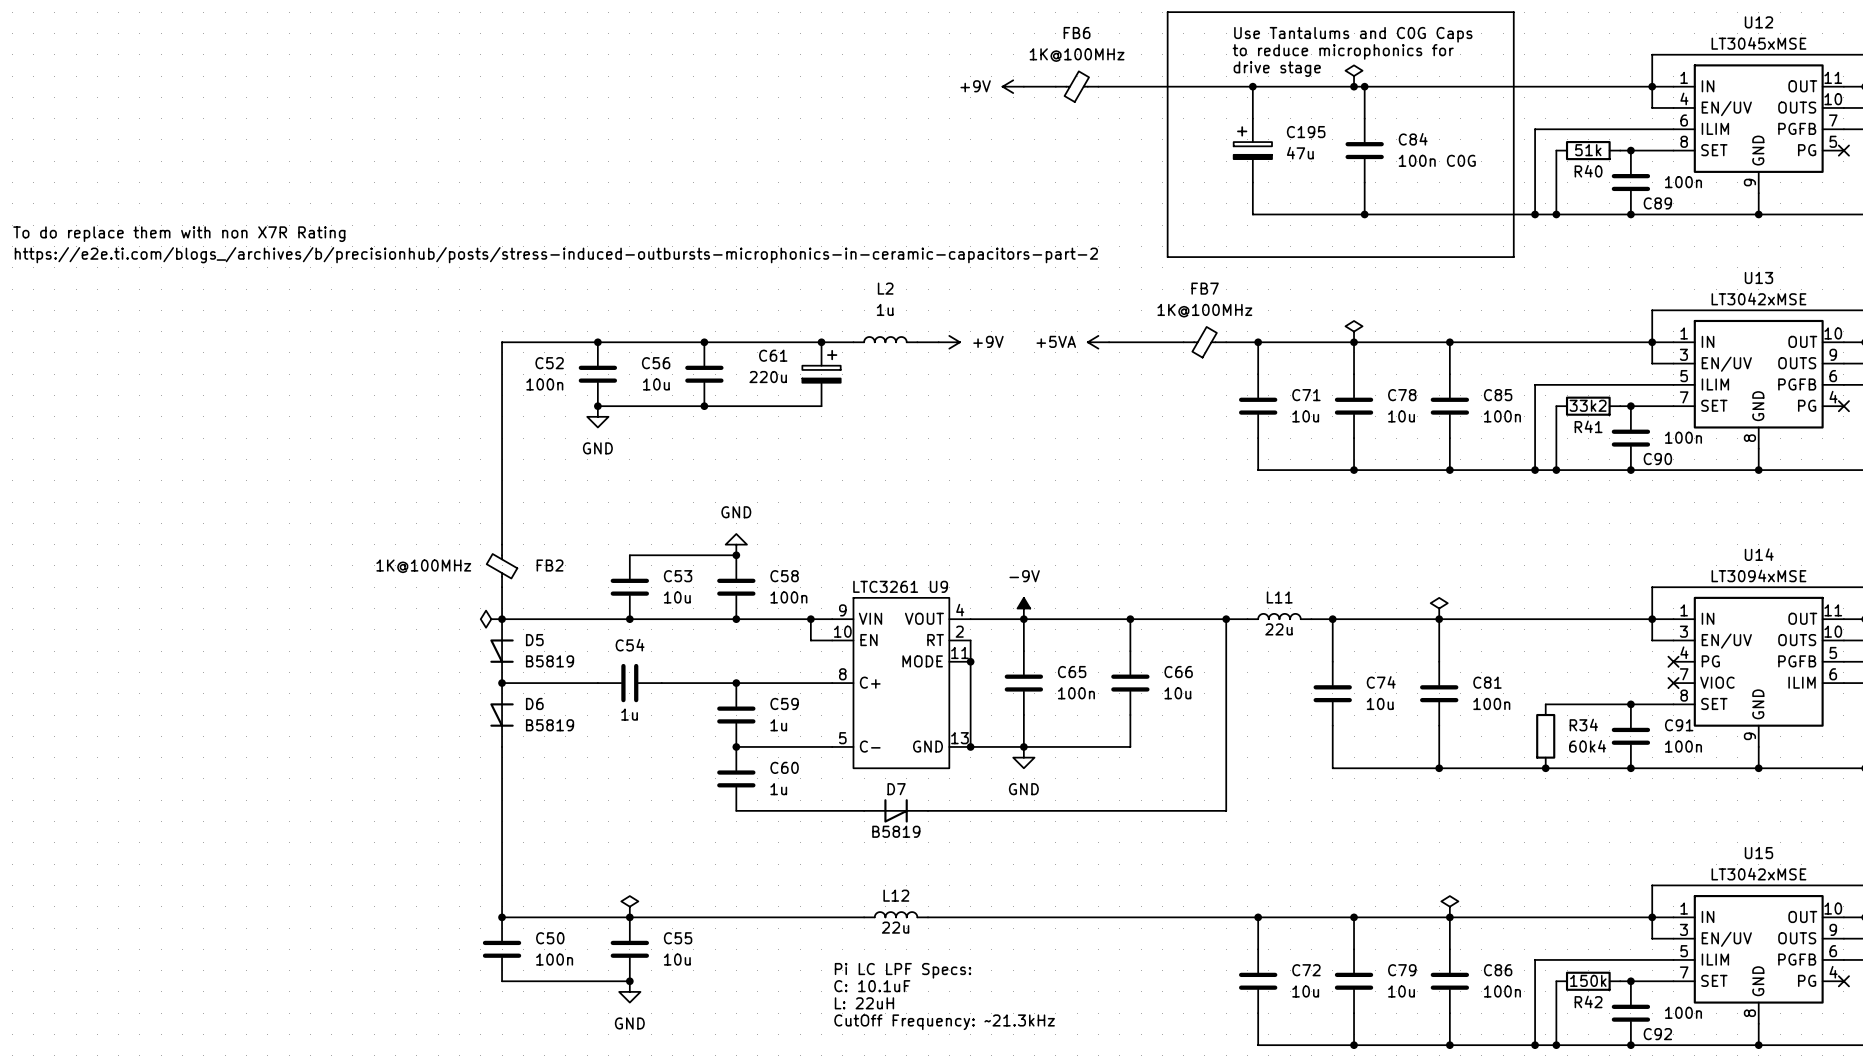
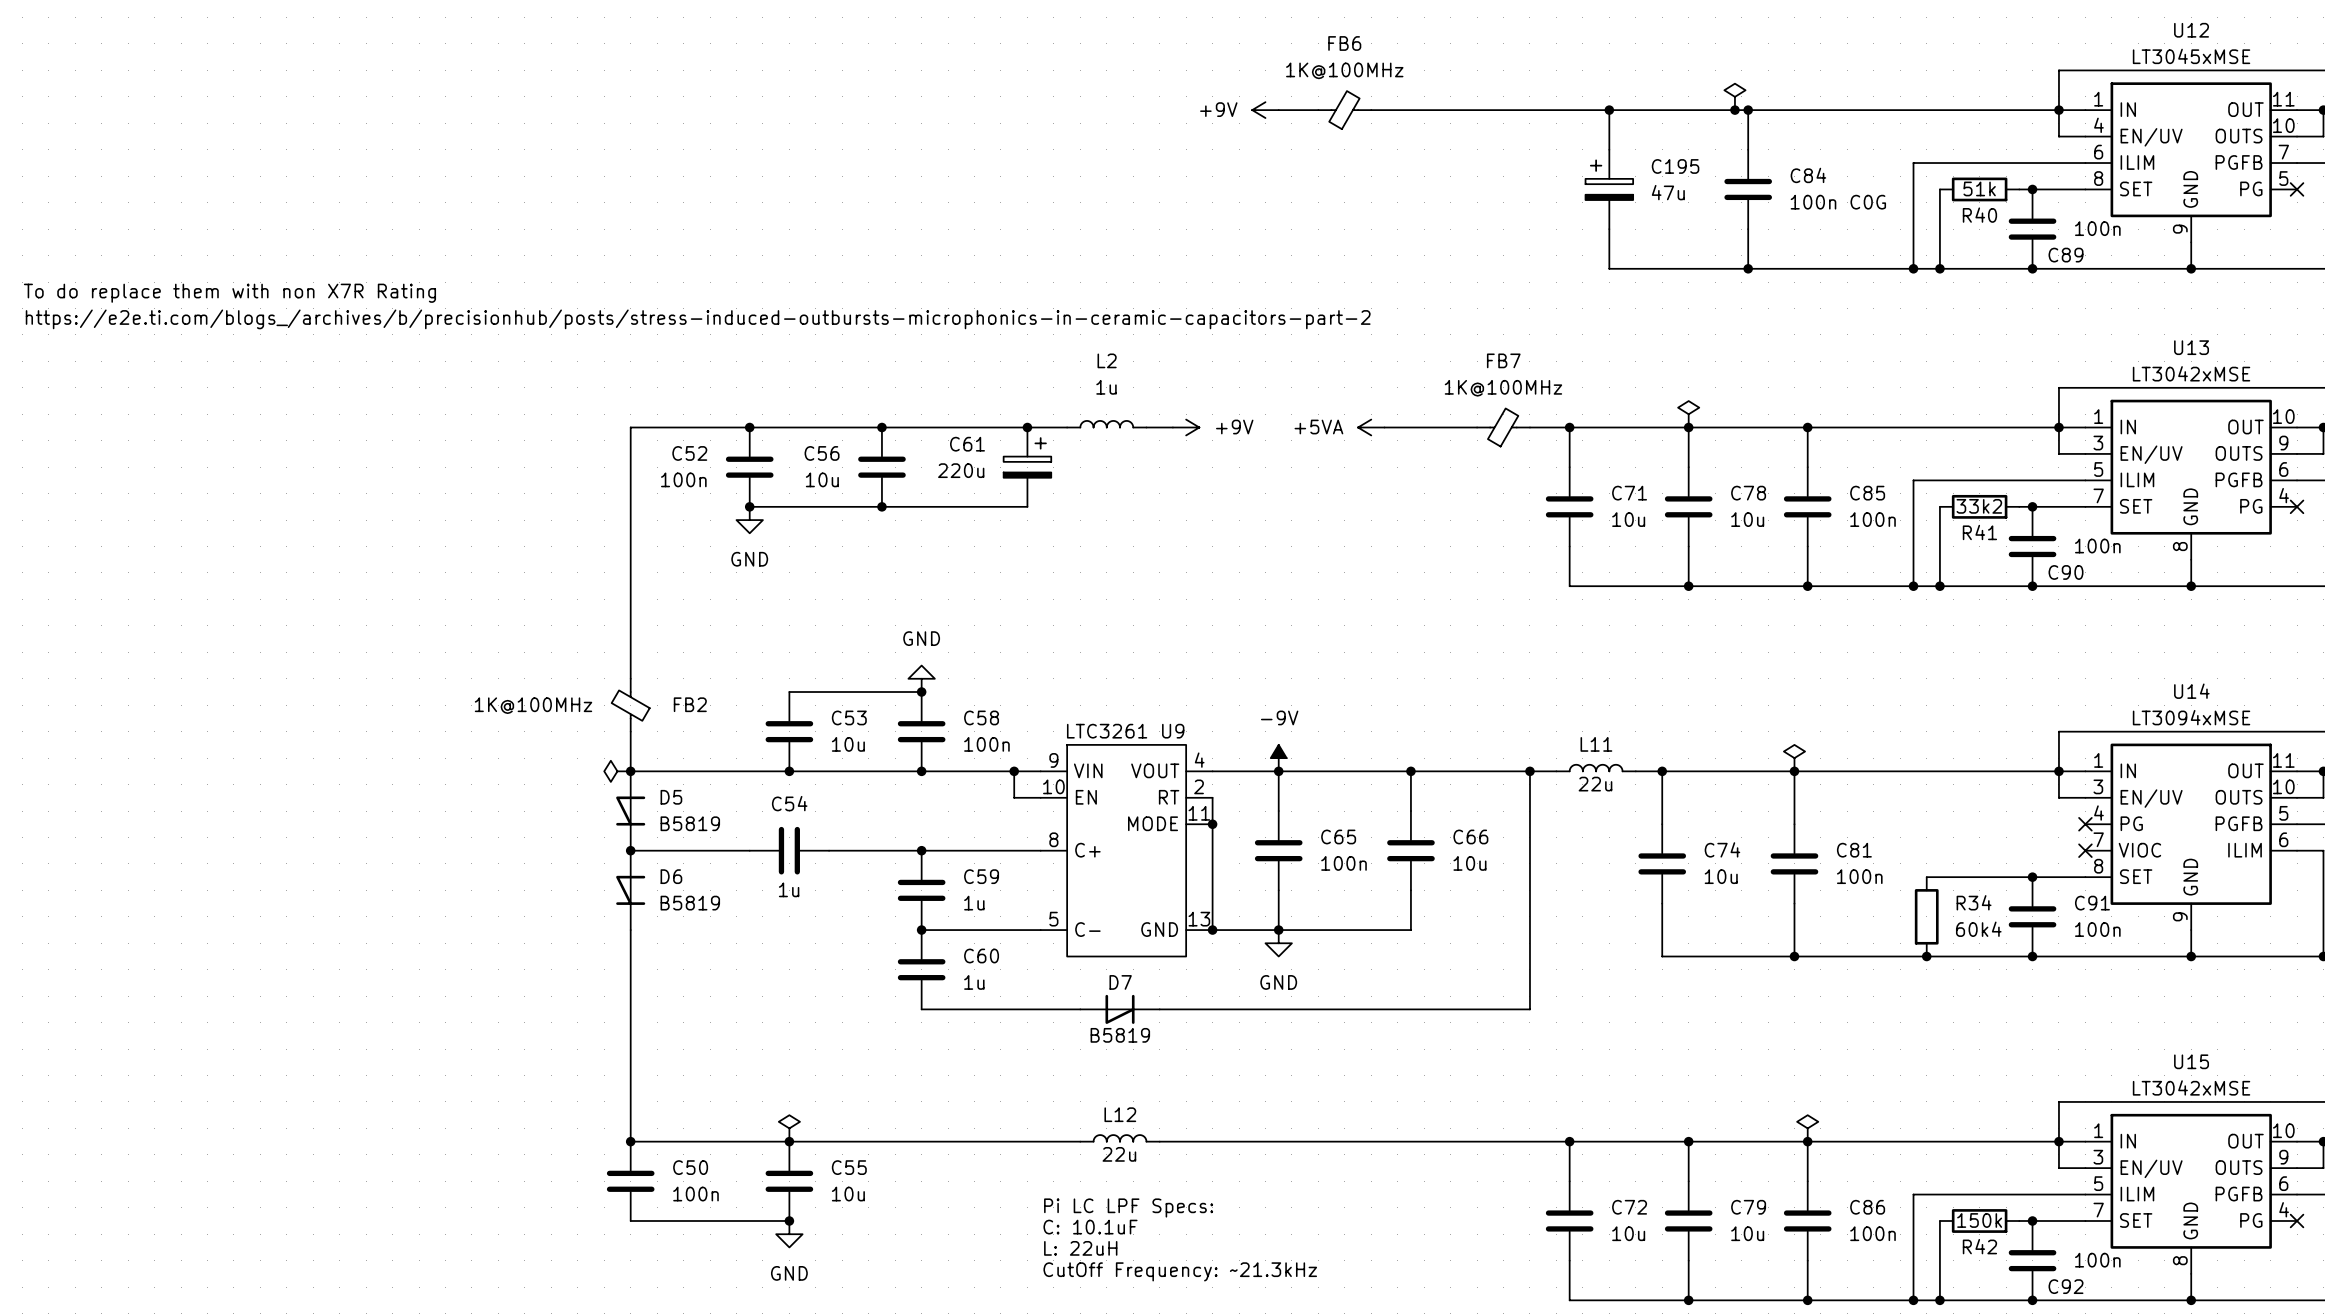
line: (1167, 12) (1513, 12) (1513, 257) (1167, 257) (1167, 12) -> none
text: Use Tantalums and C0G Caps (1353, 34) -> none
text: to reduce microphonics for (1343, 51) -> none
text: drive stage (1277, 69) -> none
power symbol position: (1354, 76) -> (1734, 96)
wire: (1252, 86) (1252, 118) -> (1609, 110) (1609, 149)
junction: (1252, 86) -> none
junction: none -> (1609, 110)
junction: (1354, 86) -> none
wire: (1364, 86) (1364, 118) -> (1748, 110) (1748, 149)
junction: (1364, 86) -> none
junction: none -> (1734, 110)
junction: none -> (1748, 110)
C195 position: (1252, 150) -> (1609, 189)
C84 position: (1364, 150) -> (1748, 189)
wire: (1252, 182) (1252, 214) (1290, 214) -> (1609, 229) (1609, 268)
wire: (1364, 182) (1364, 214) -> (1748, 229) (1748, 268)
junction position: (1364, 214) -> (1748, 268)

